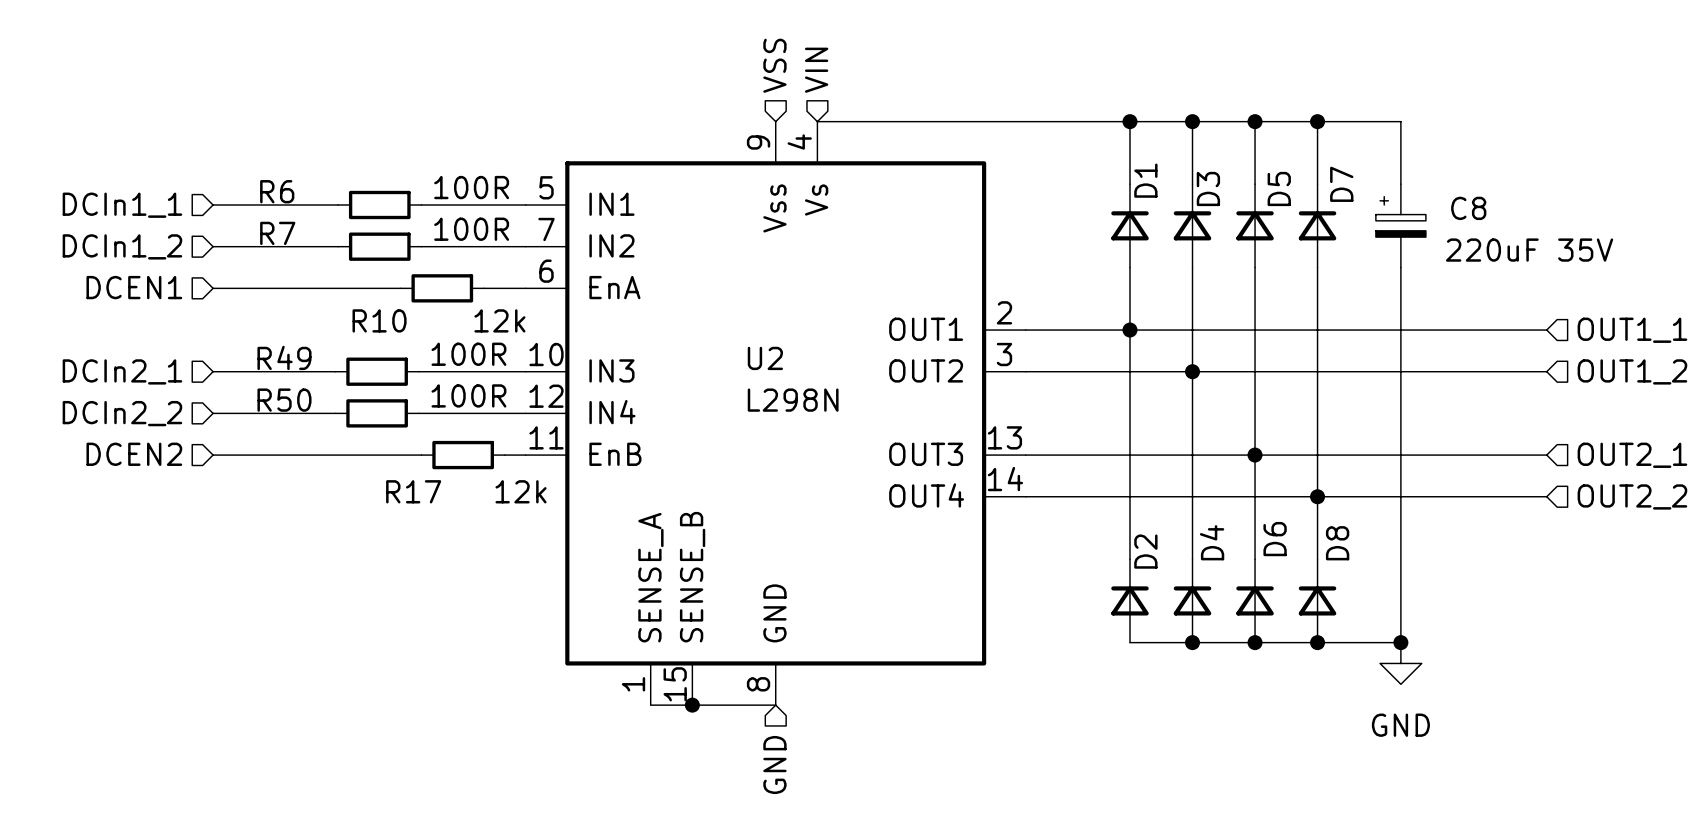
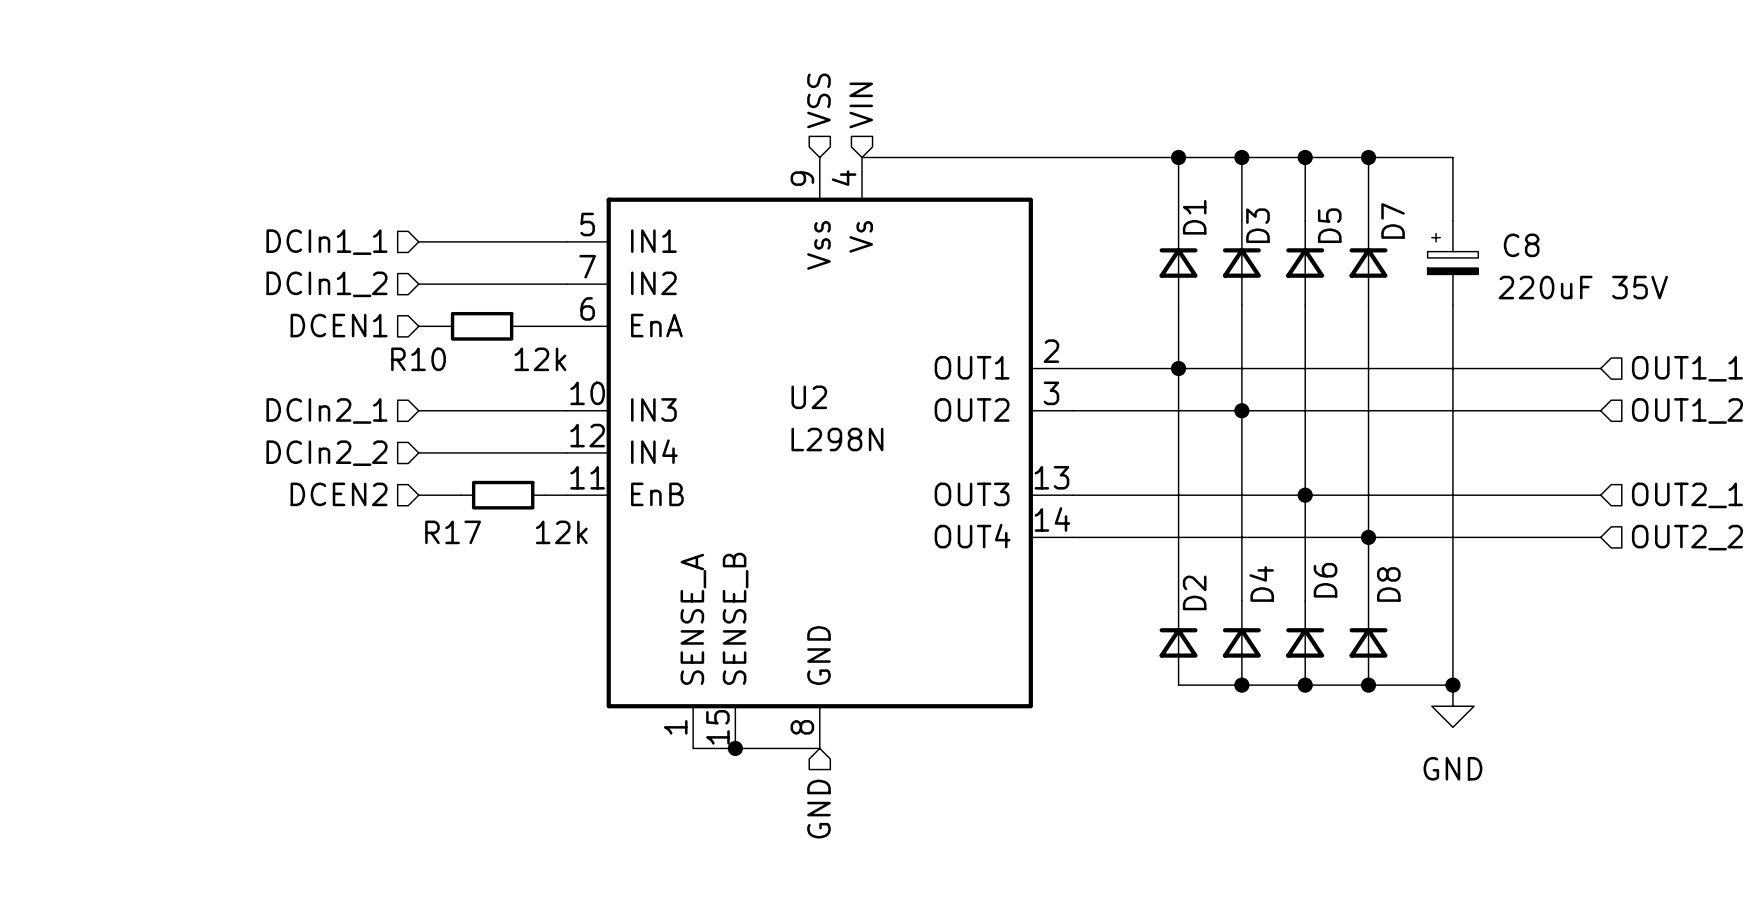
hierarchical label position: DCIn1_1 (122, 205) -> DCIn1_1 (326, 242)
wire: (213, 205) (338, 205) -> none
wire: none -> (418, 241) (460, 241)
R6: 100R (379, 205) -> none
hierarchical label position: DCIn1_2 (122, 246) -> DCIn1_2 (326, 284)
wire: (213, 246) (338, 246) -> none
wire: none -> (418, 284) (460, 284)
R7: 100R (379, 246) -> none
hierarchical label position: DCEN1 (134, 287) -> DCEN1 (339, 325)
wire: (213, 288) (379, 288) -> none
hierarchical label position: DCIn2_1 (122, 371) -> DCIn2_1 (326, 410)
wire: (213, 371) (335, 371) -> none
R49: 100R (377, 371) -> none
wire: none -> (418, 410) (458, 410)
hierarchical label position: DCIn2_2 (122, 413) -> DCIn2_2 (326, 453)
wire: (213, 413) (335, 413) -> none
R50: 100R (377, 413) -> none
wire: none -> (418, 452) (458, 452)
hierarchical label position: DCEN2 (134, 454) -> DCEN2 (339, 494)
wire: (213, 455) (379, 455) -> none

